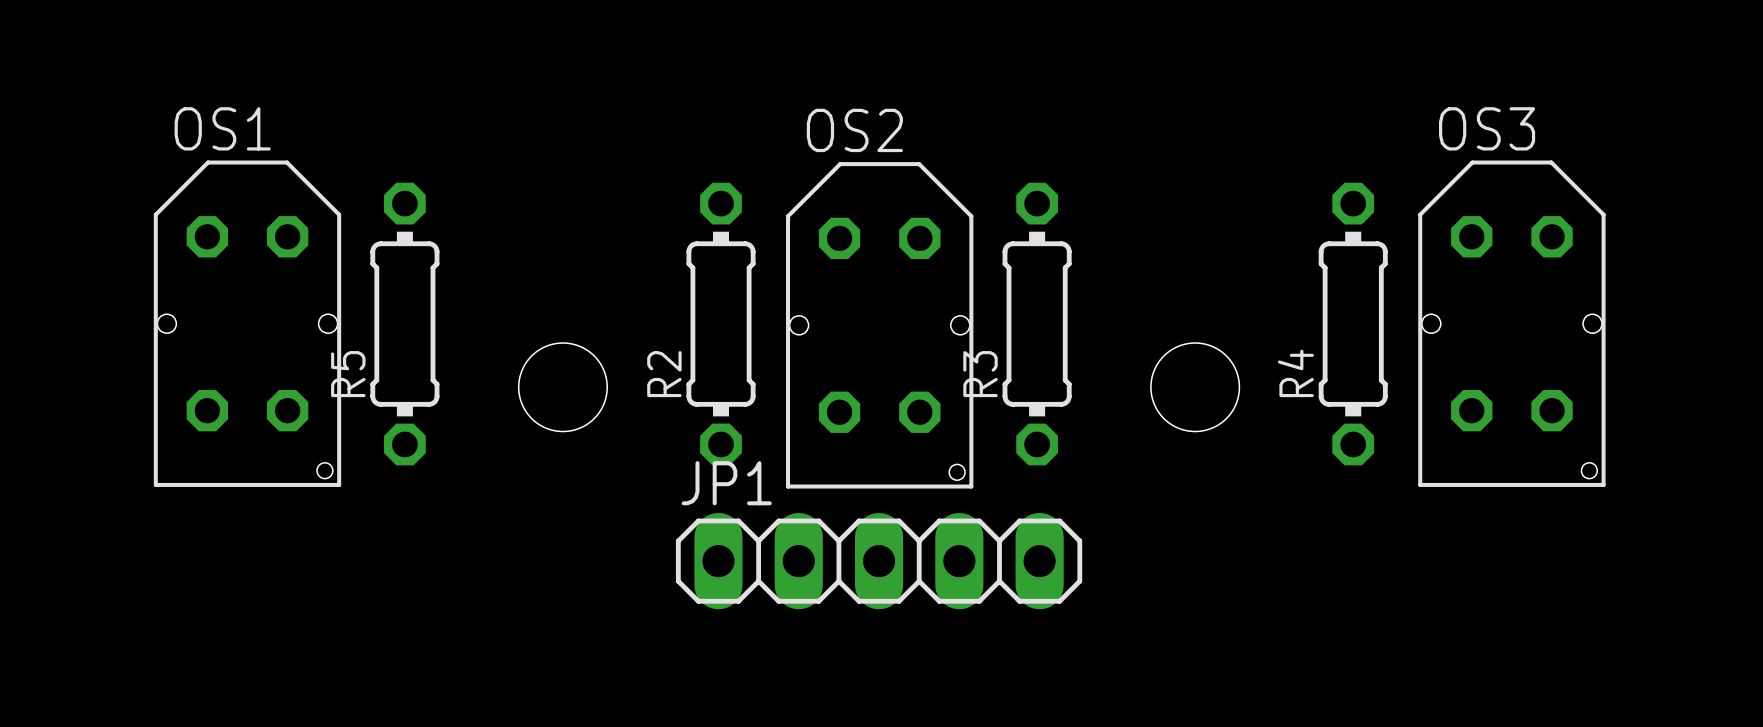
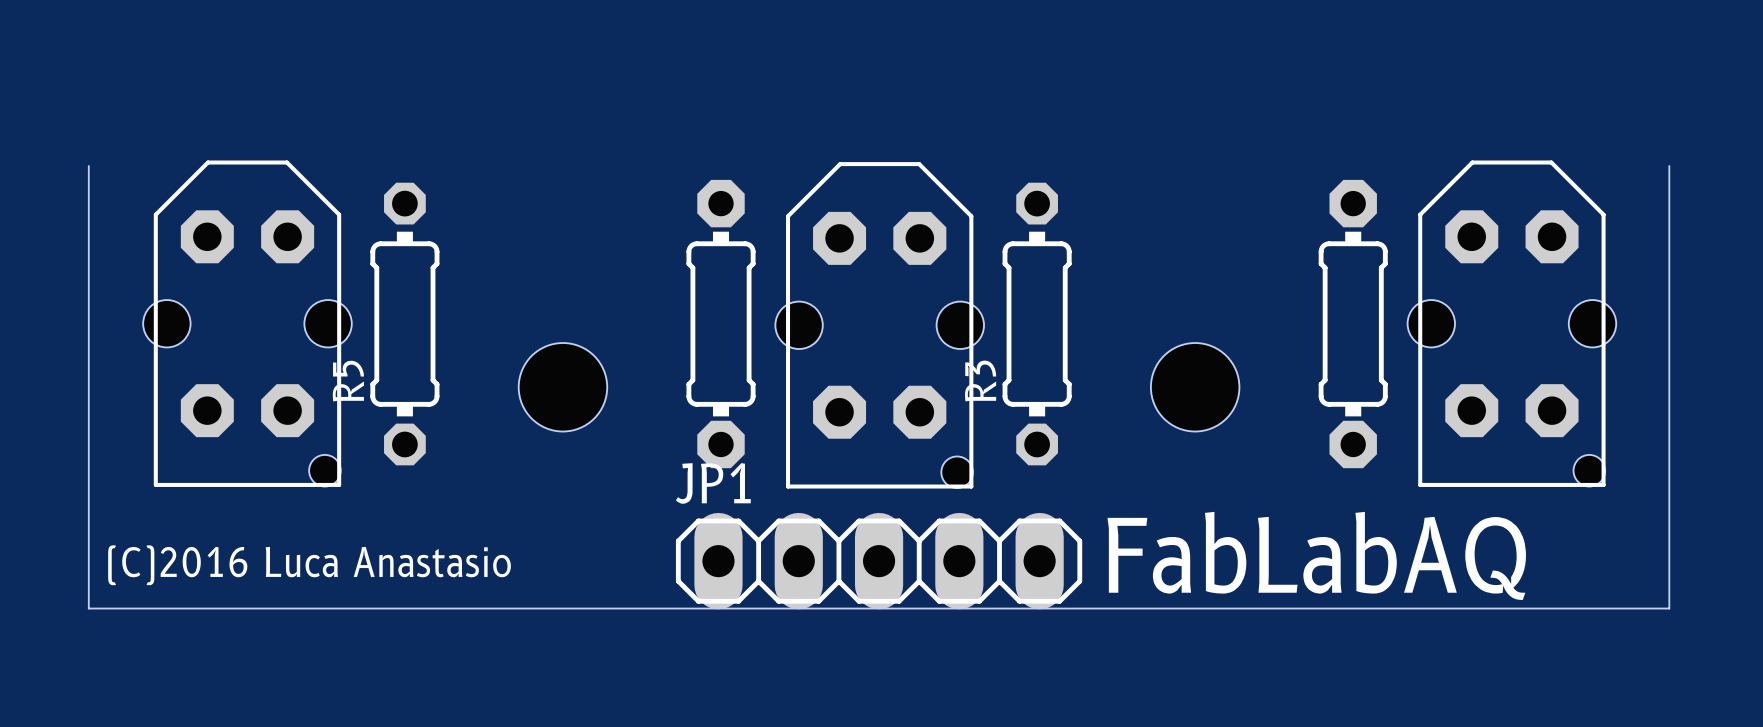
board edge: none -> (88, 165) (88, 608) (1669, 608) (1669, 165)
OS1: (247, 323) -> none
part: none -> (247, 323)
OS3: (1511, 323) -> none
part: none -> (1511, 323)
R2: (721, 324) -> none
part: none -> (721, 324)
R4: (1353, 324) -> none
part: none -> (1353, 324)
OS2: (879, 325) -> none
part: none -> (879, 325)
text: none -> FabLabAQ (1316, 555)
text: none -> (C)2016 Luca Anastasio (309, 565)

